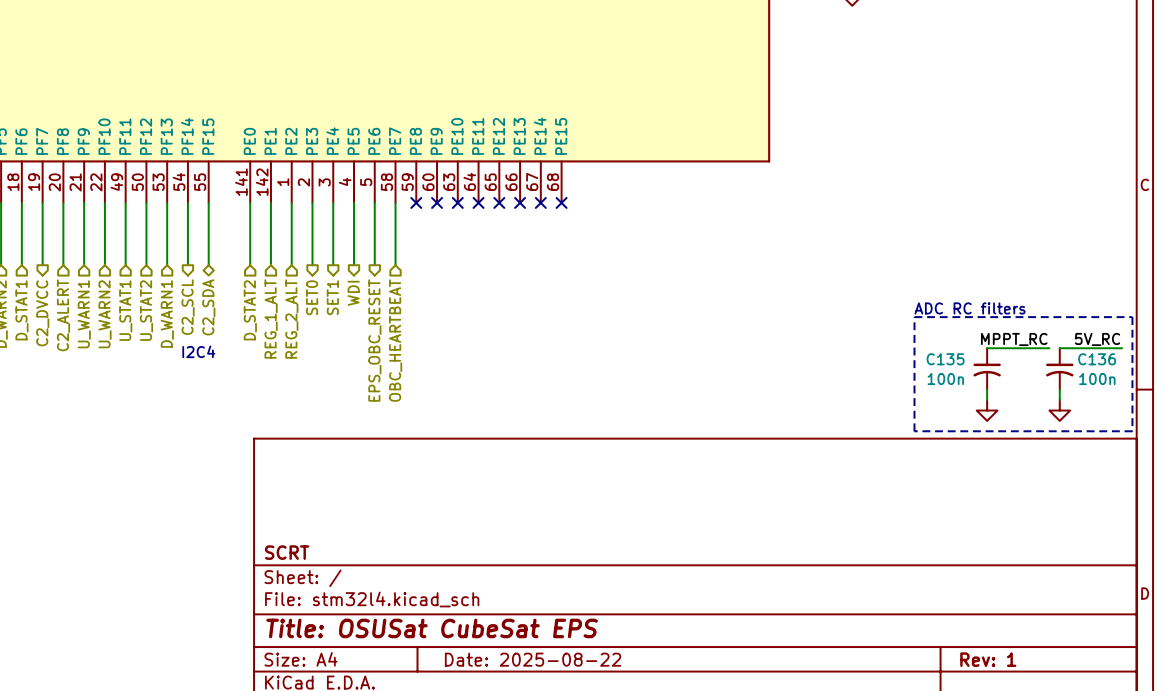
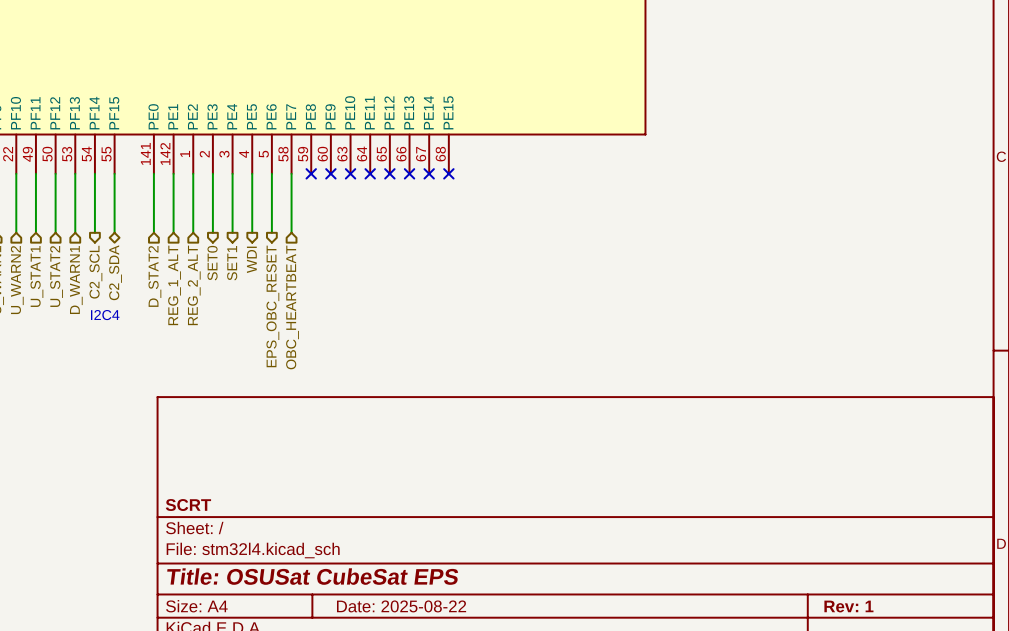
text: ADC RC filters (970, 308) -> none
line: (914, 317) (1132, 317) (1132, 431) (914, 431) (914, 317) -> none
label: MPPT_RC (1014, 339) -> none
label: 5V_RC (1097, 339) -> none
wire: (987, 348) (1049, 348) -> none
wire: (1059, 348) (1122, 348) -> none
C135: 100n (987, 369) -> none
C136: 100n (1059, 369) -> none
wire: (987, 389) (987, 400) -> none
wire: (1059, 389) (1059, 400) -> none
power symbol: (987, 410) -> none
power symbol: (1059, 410) -> none

